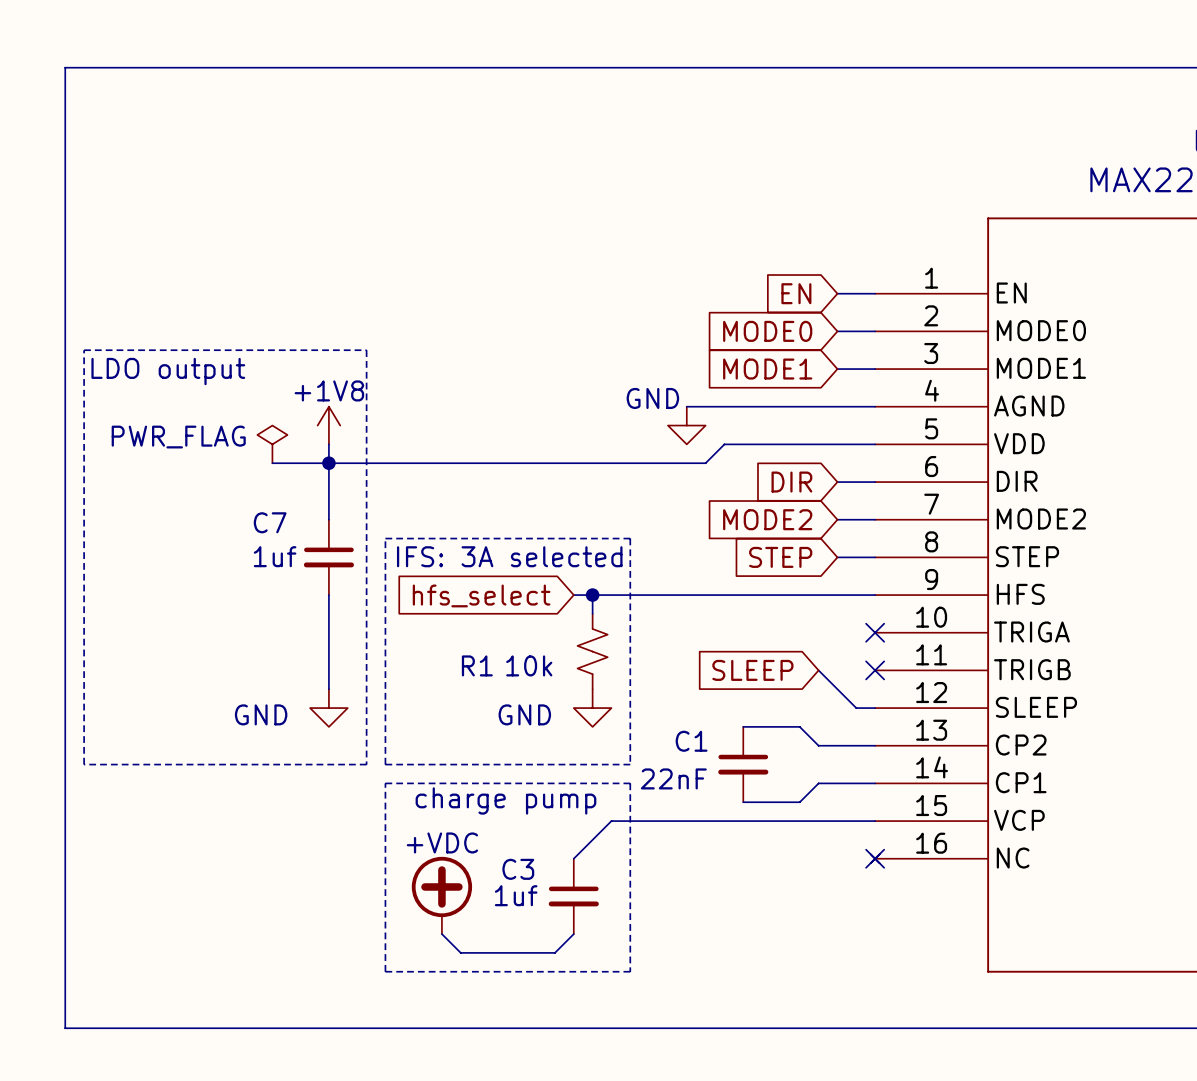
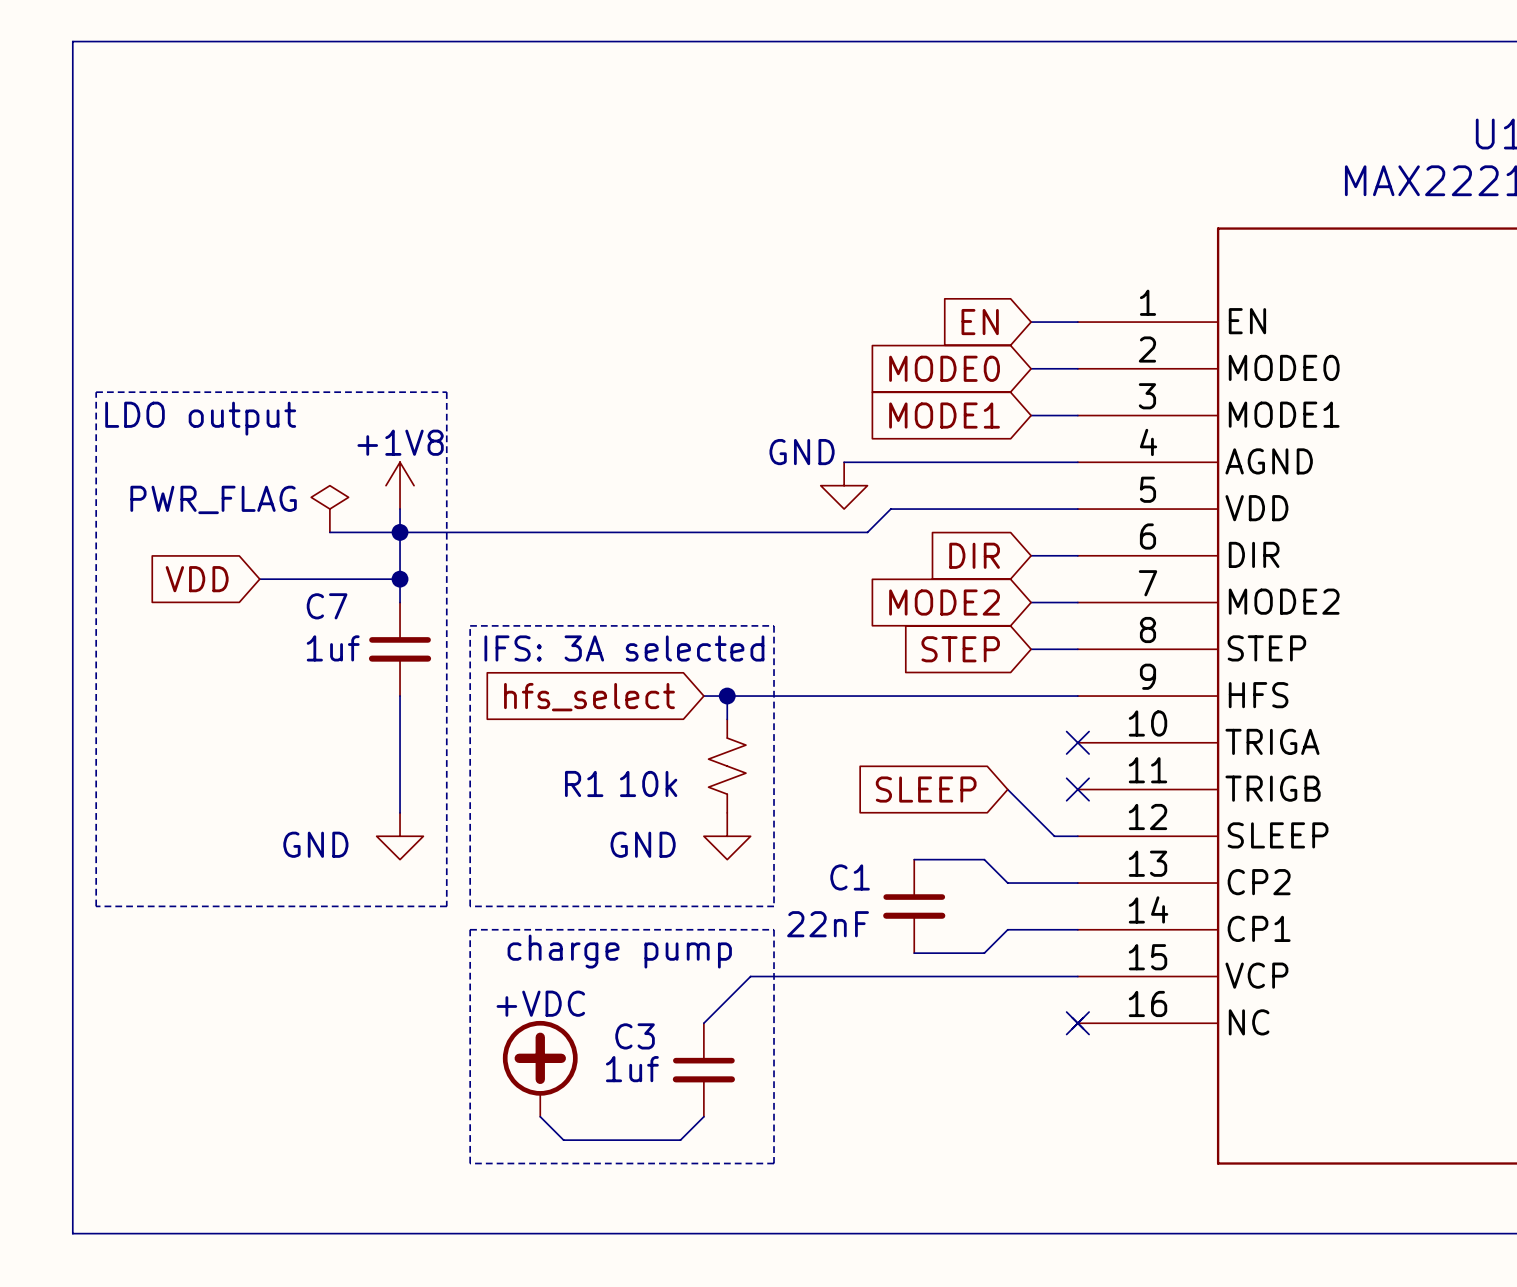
global label: none -> VDD (197, 579)
wire: none -> (259, 579) (400, 579)
junction: none -> (400, 579)

